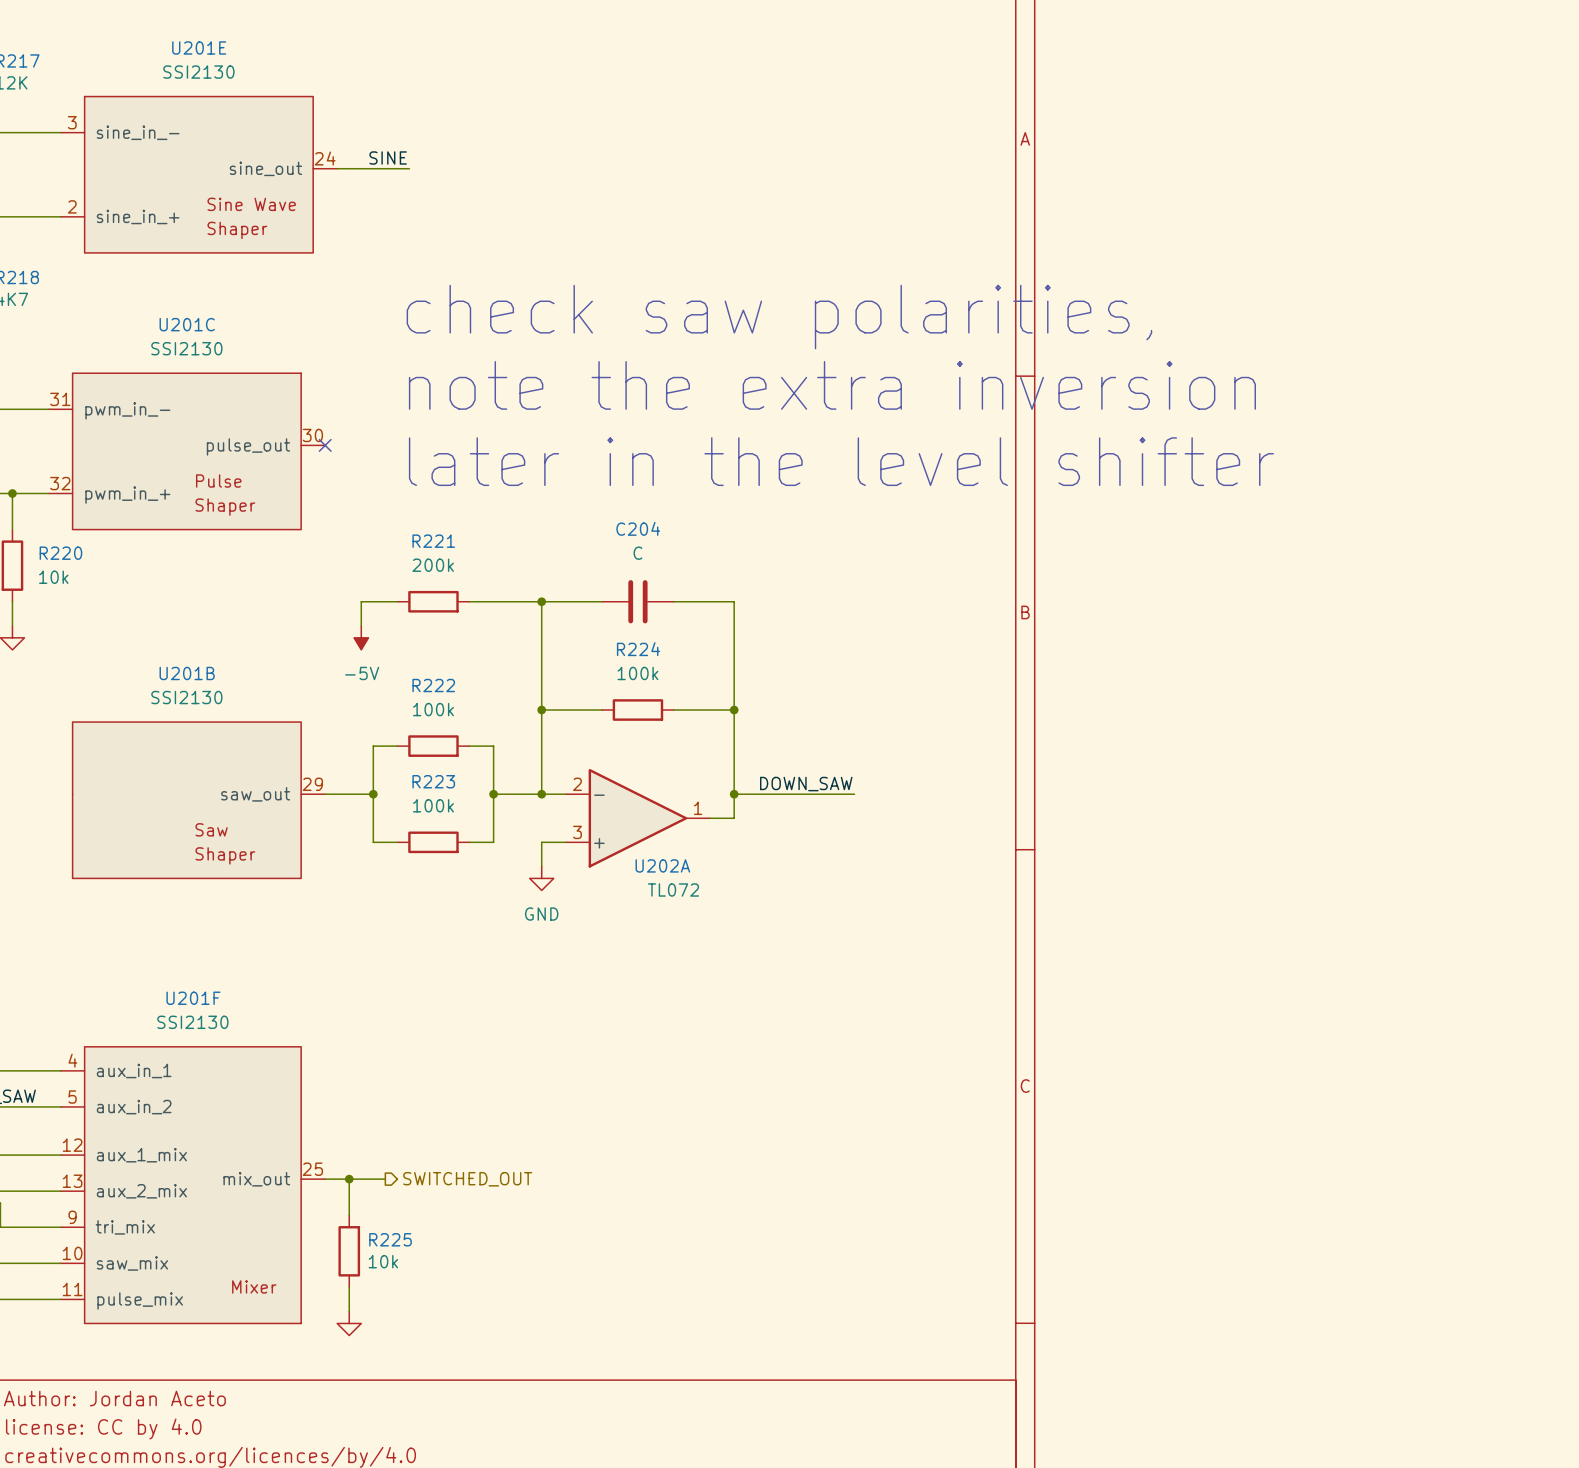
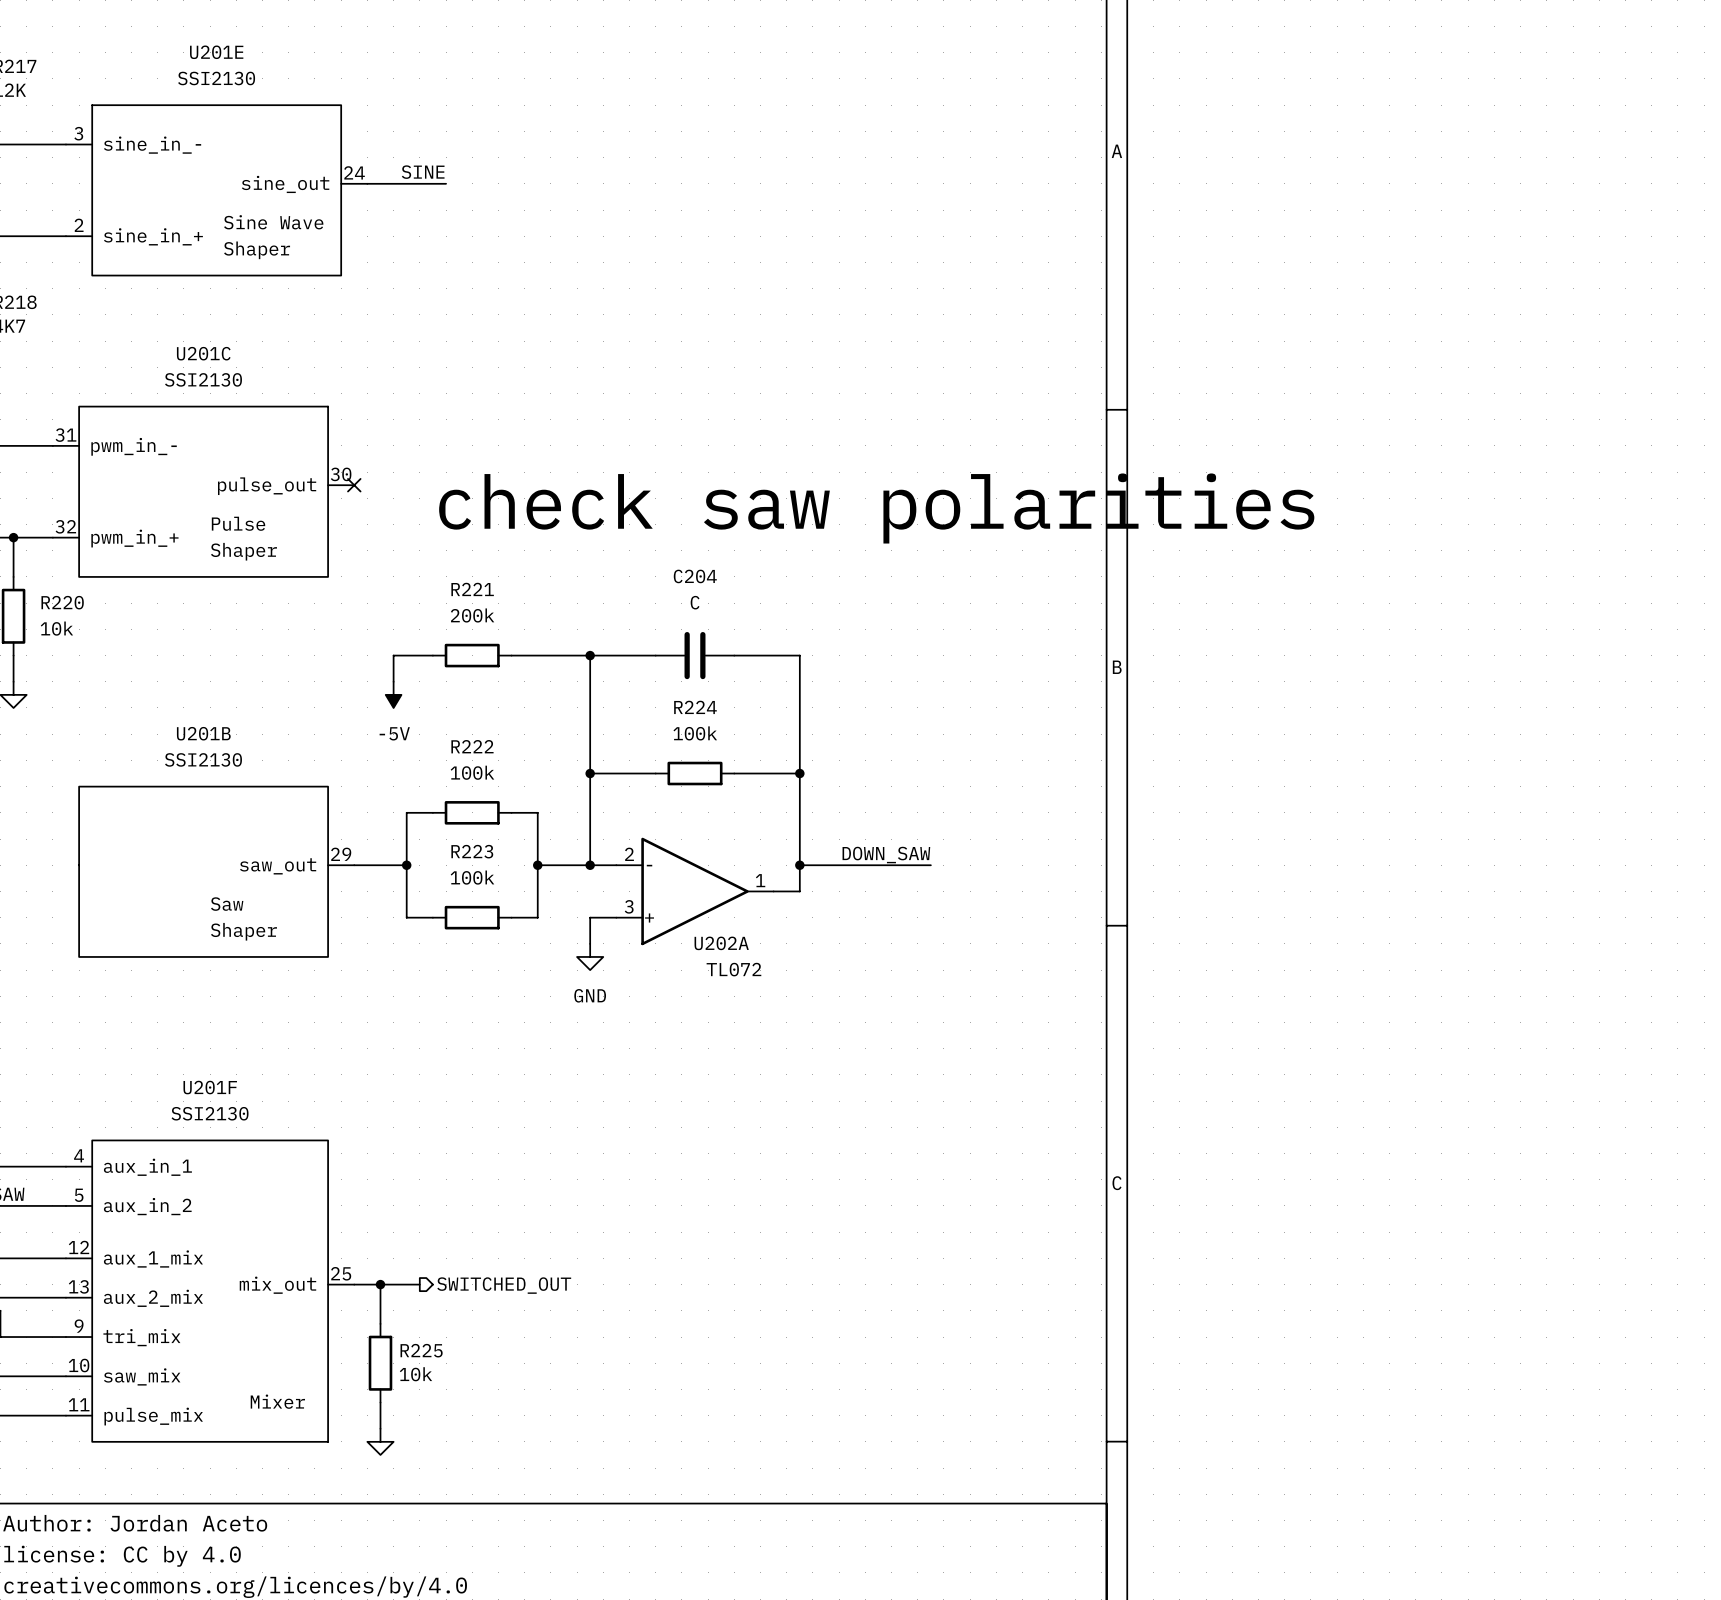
text: check saw polarities, (779, 317) -> none
text: note the extra inversion (832, 385) -> none
text: later in the level shifter (841, 461) -> check saw polarities (876, 508)

